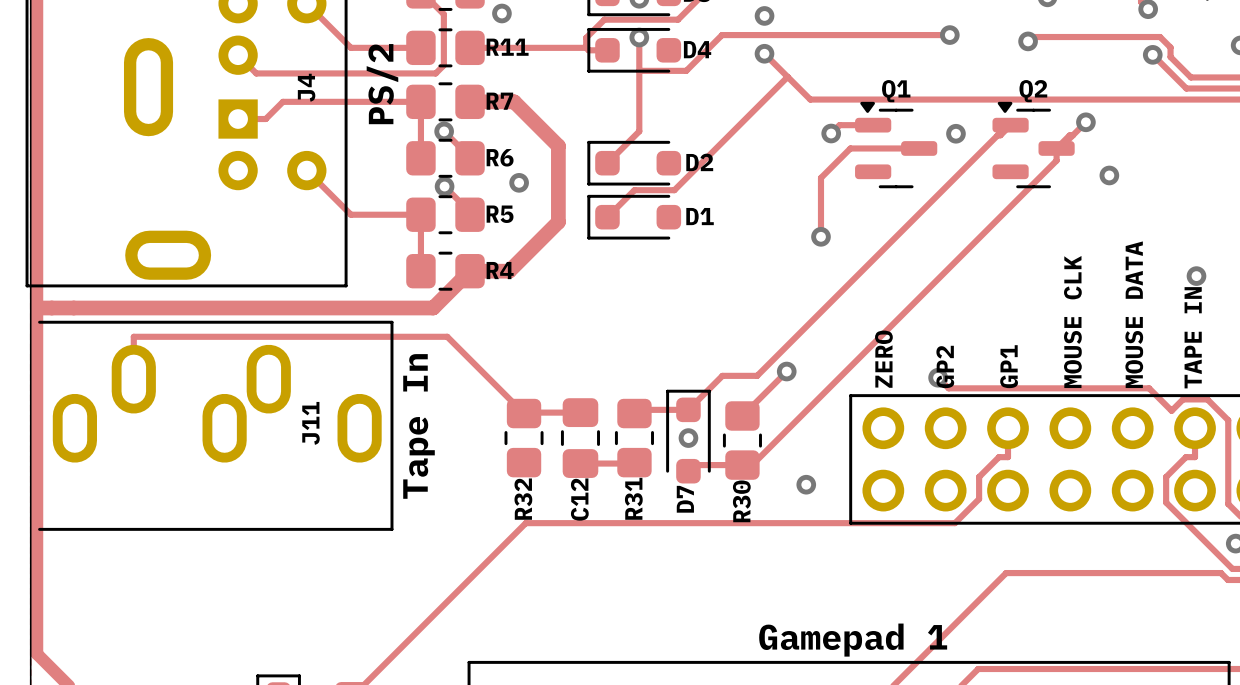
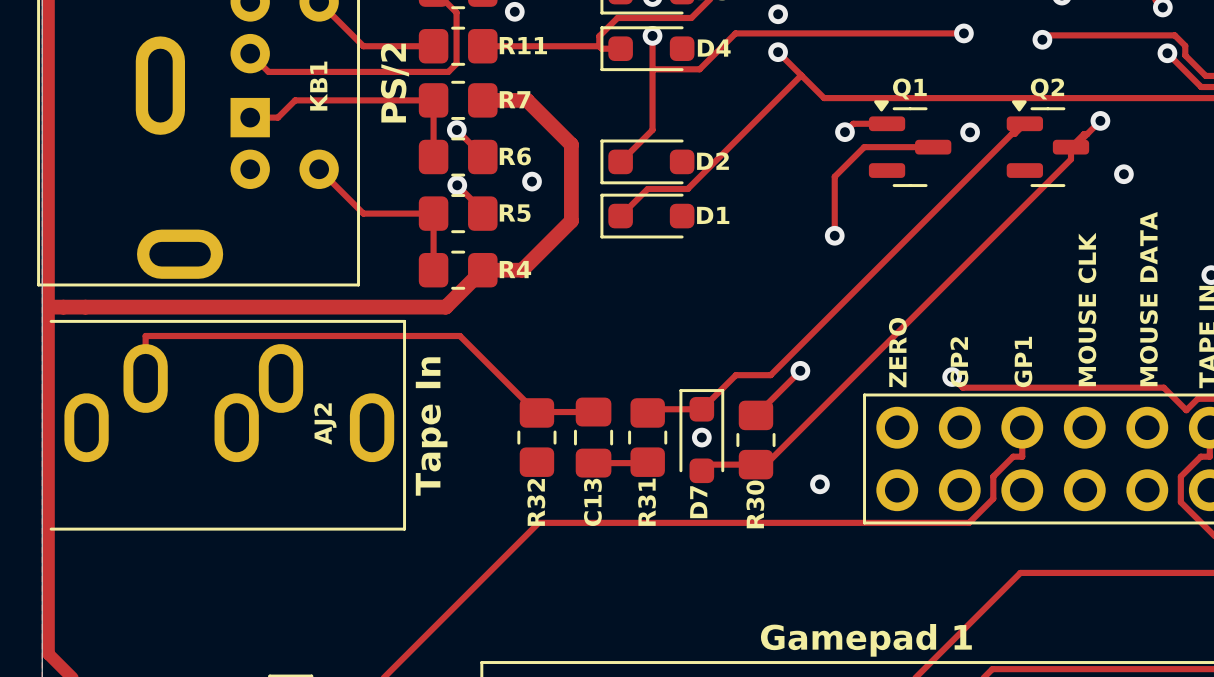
J4 name: J4 (306, 87) -> KB1 (318, 86)
J11 name: J11 (310, 423) -> AJ2 (325, 424)
C12 name: C12 (579, 499) -> C13 (592, 502)

